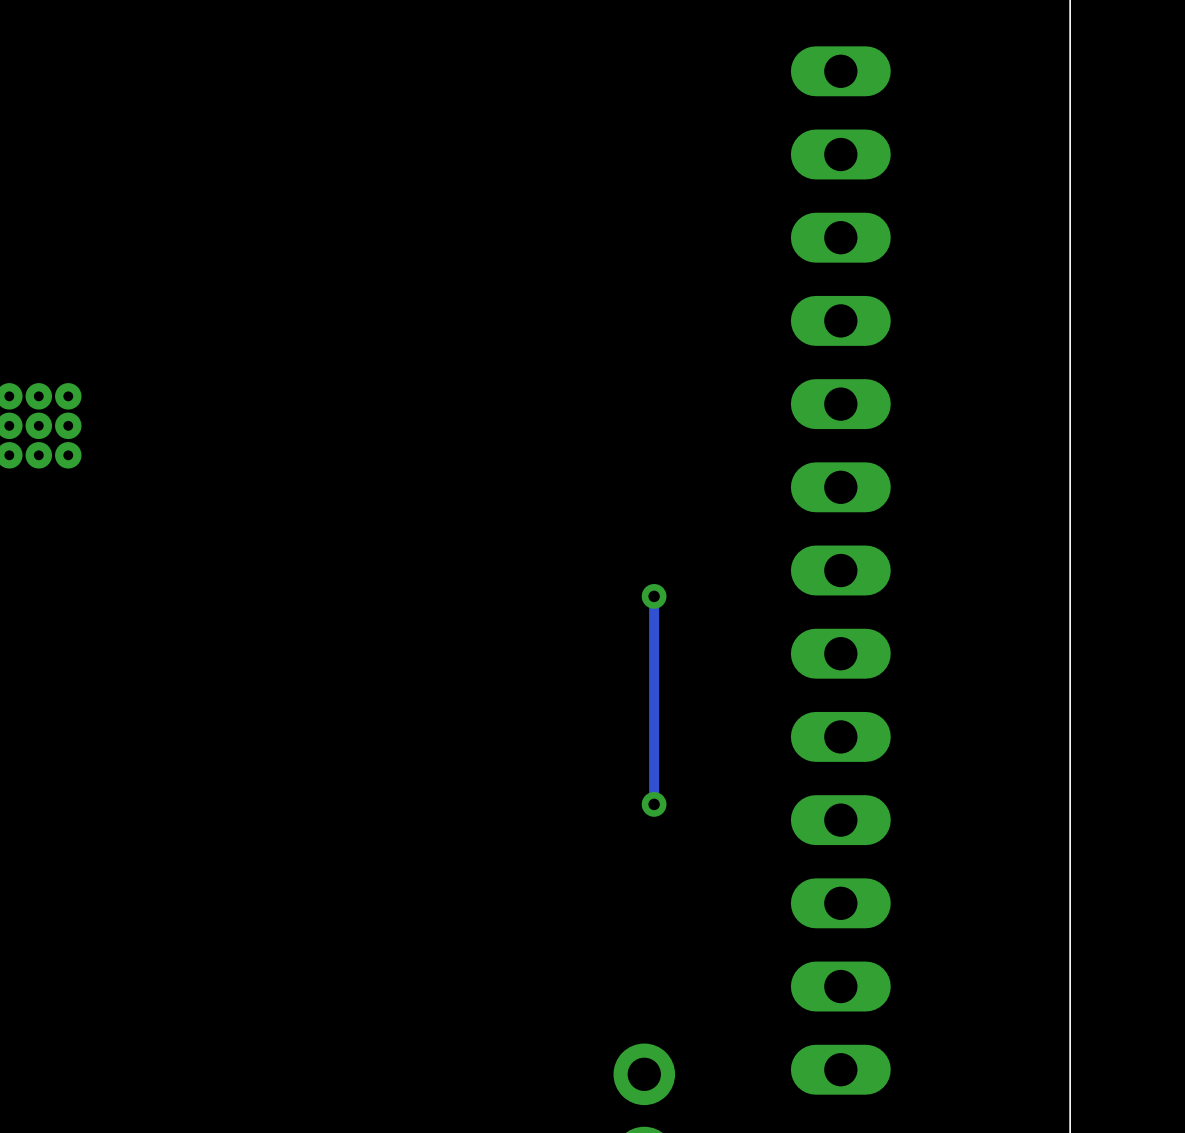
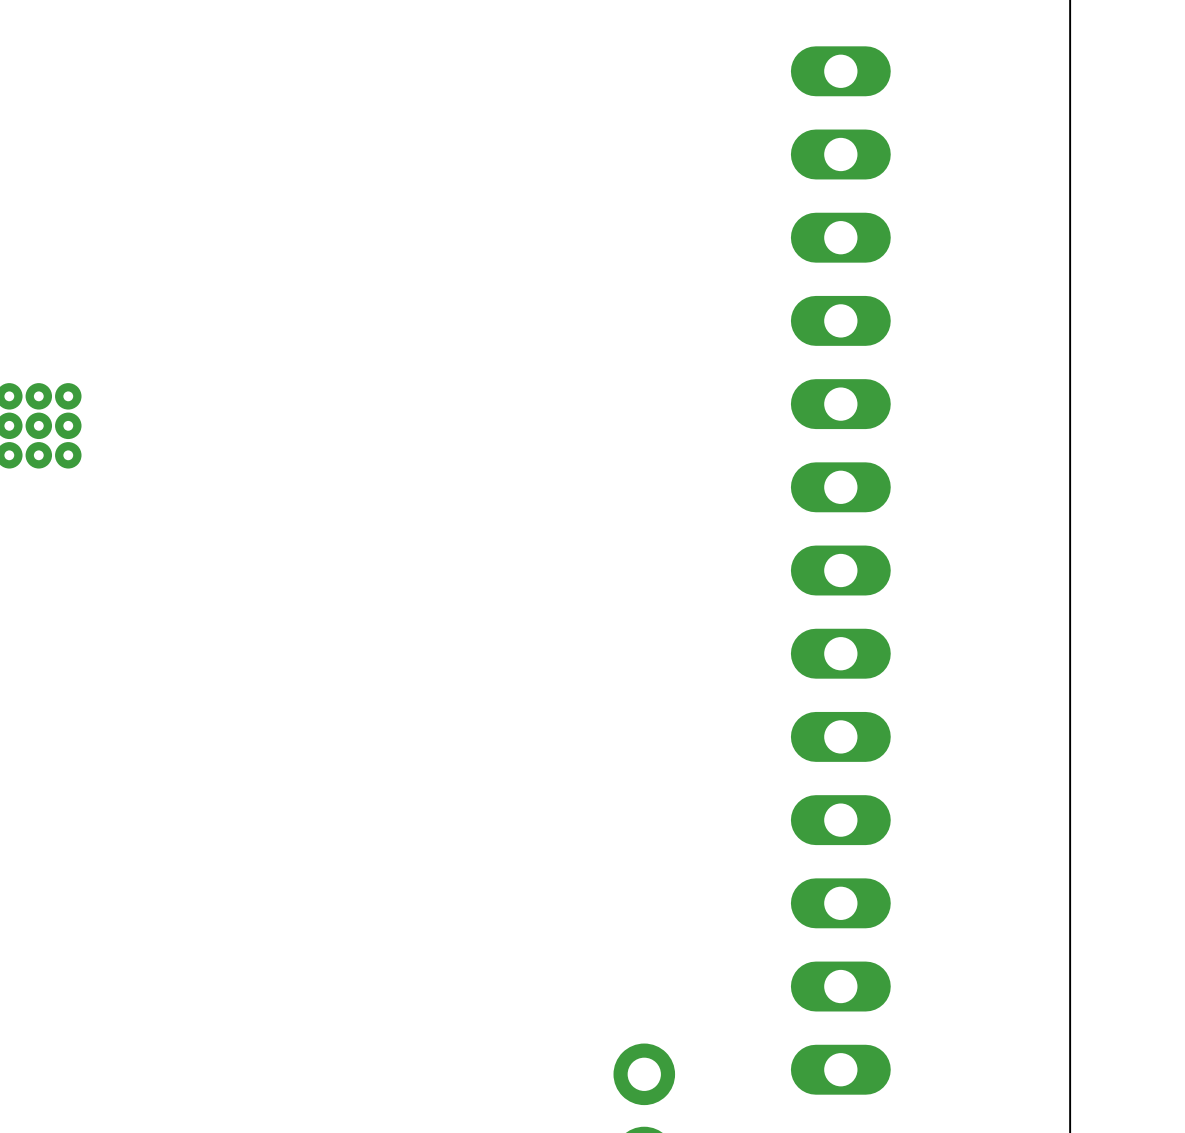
track: (654, 596) (654, 804) -> none
via: (654, 596) -> none
via: (654, 804) -> none

